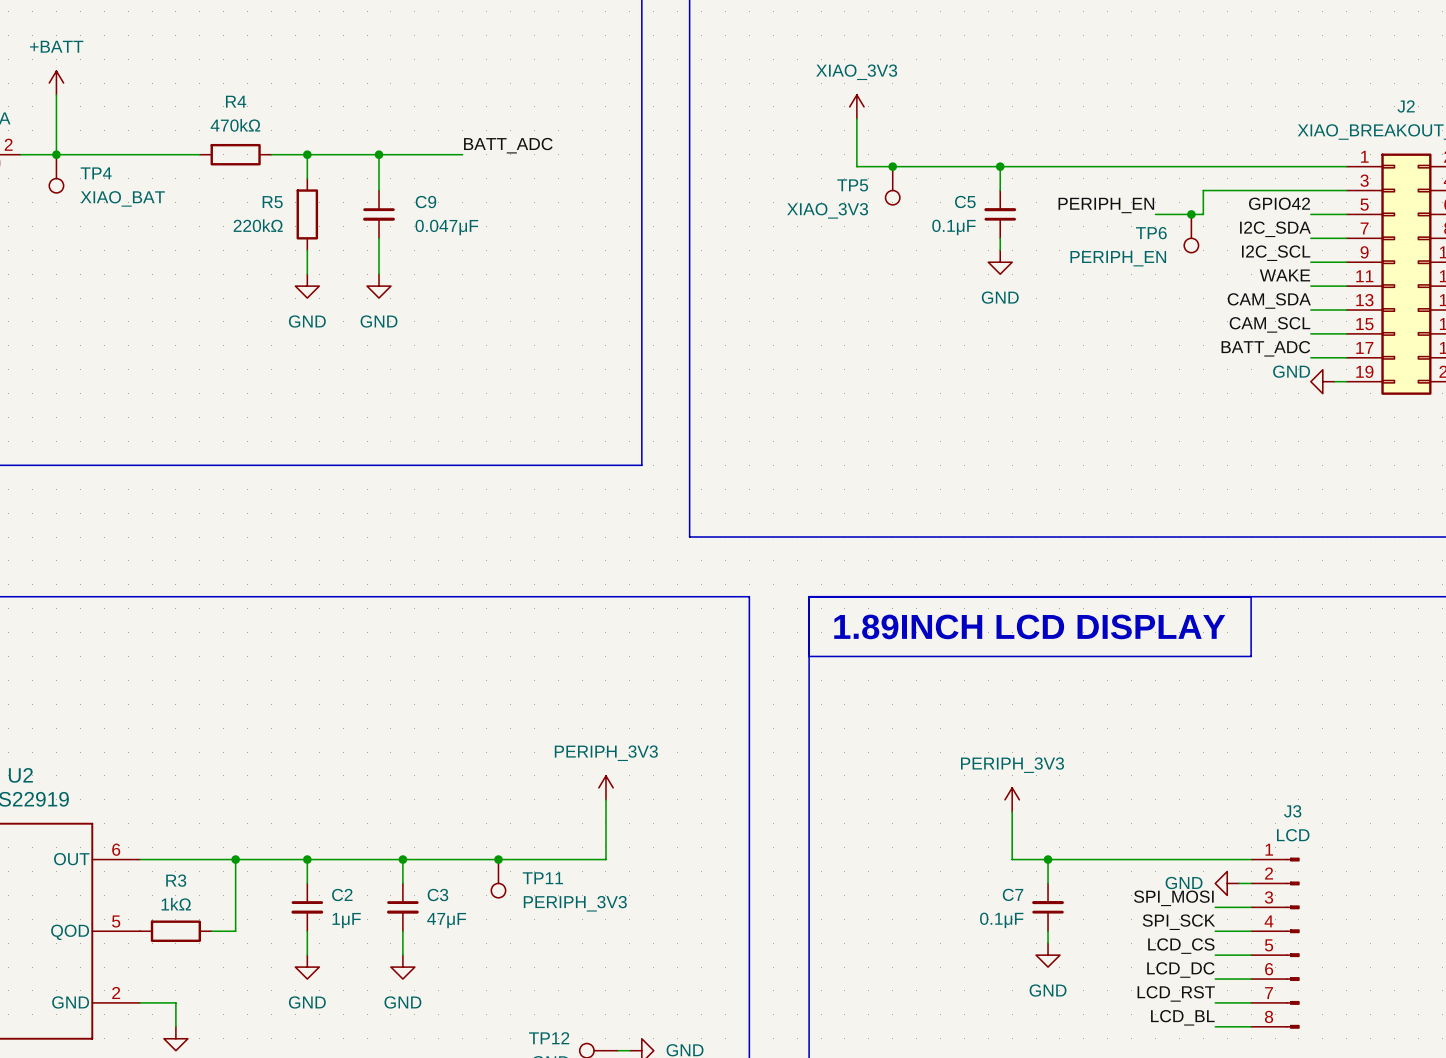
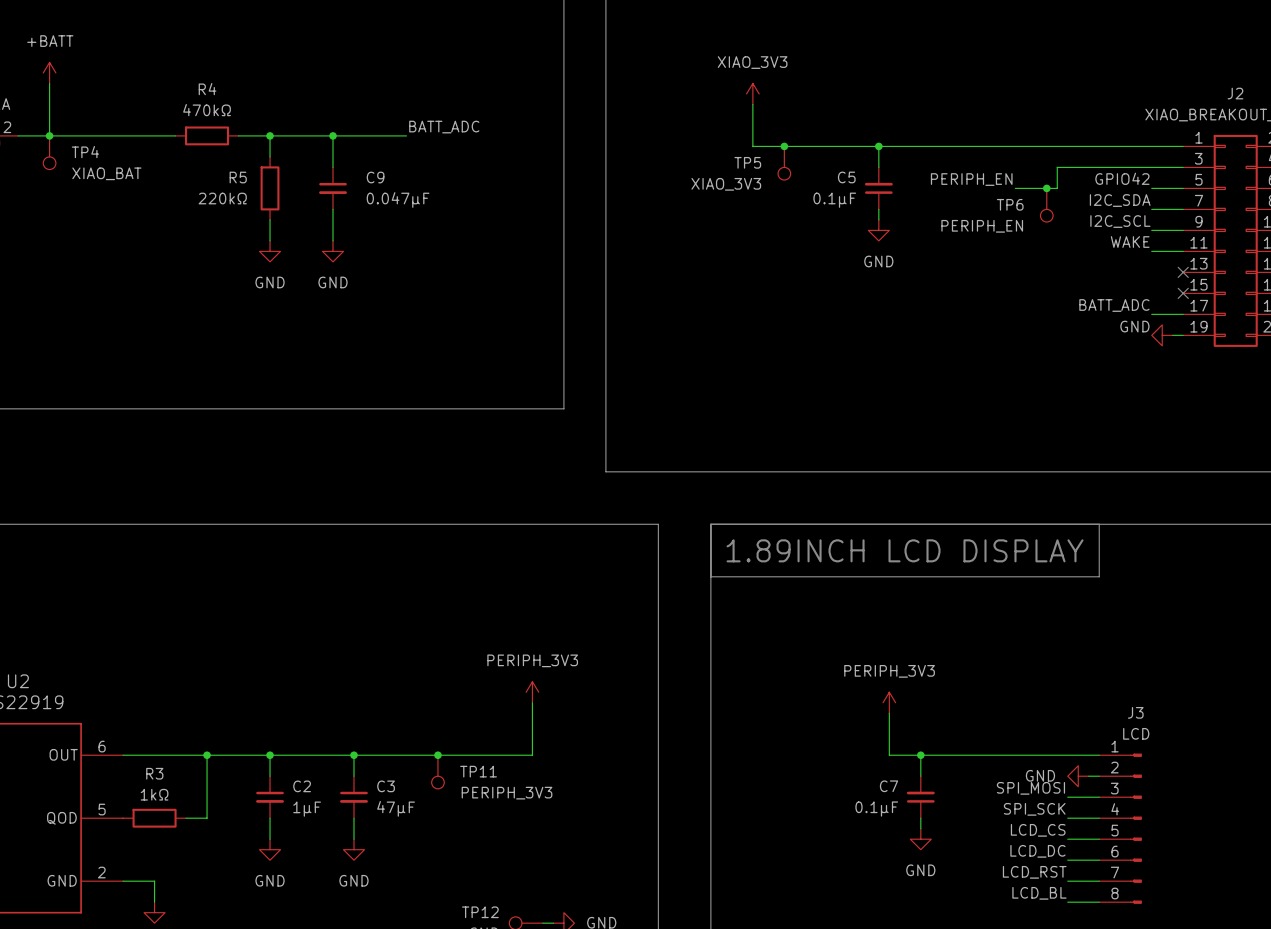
label: CAM_SDA (1269, 300) -> none
wire: (1310, 310) (1346, 310) -> none
no-connect mark: none -> (1183, 272)
label: CAM_SCL (1269, 324) -> none
wire: (1310, 333) (1346, 333) -> none
no-connect mark: none -> (1183, 293)

